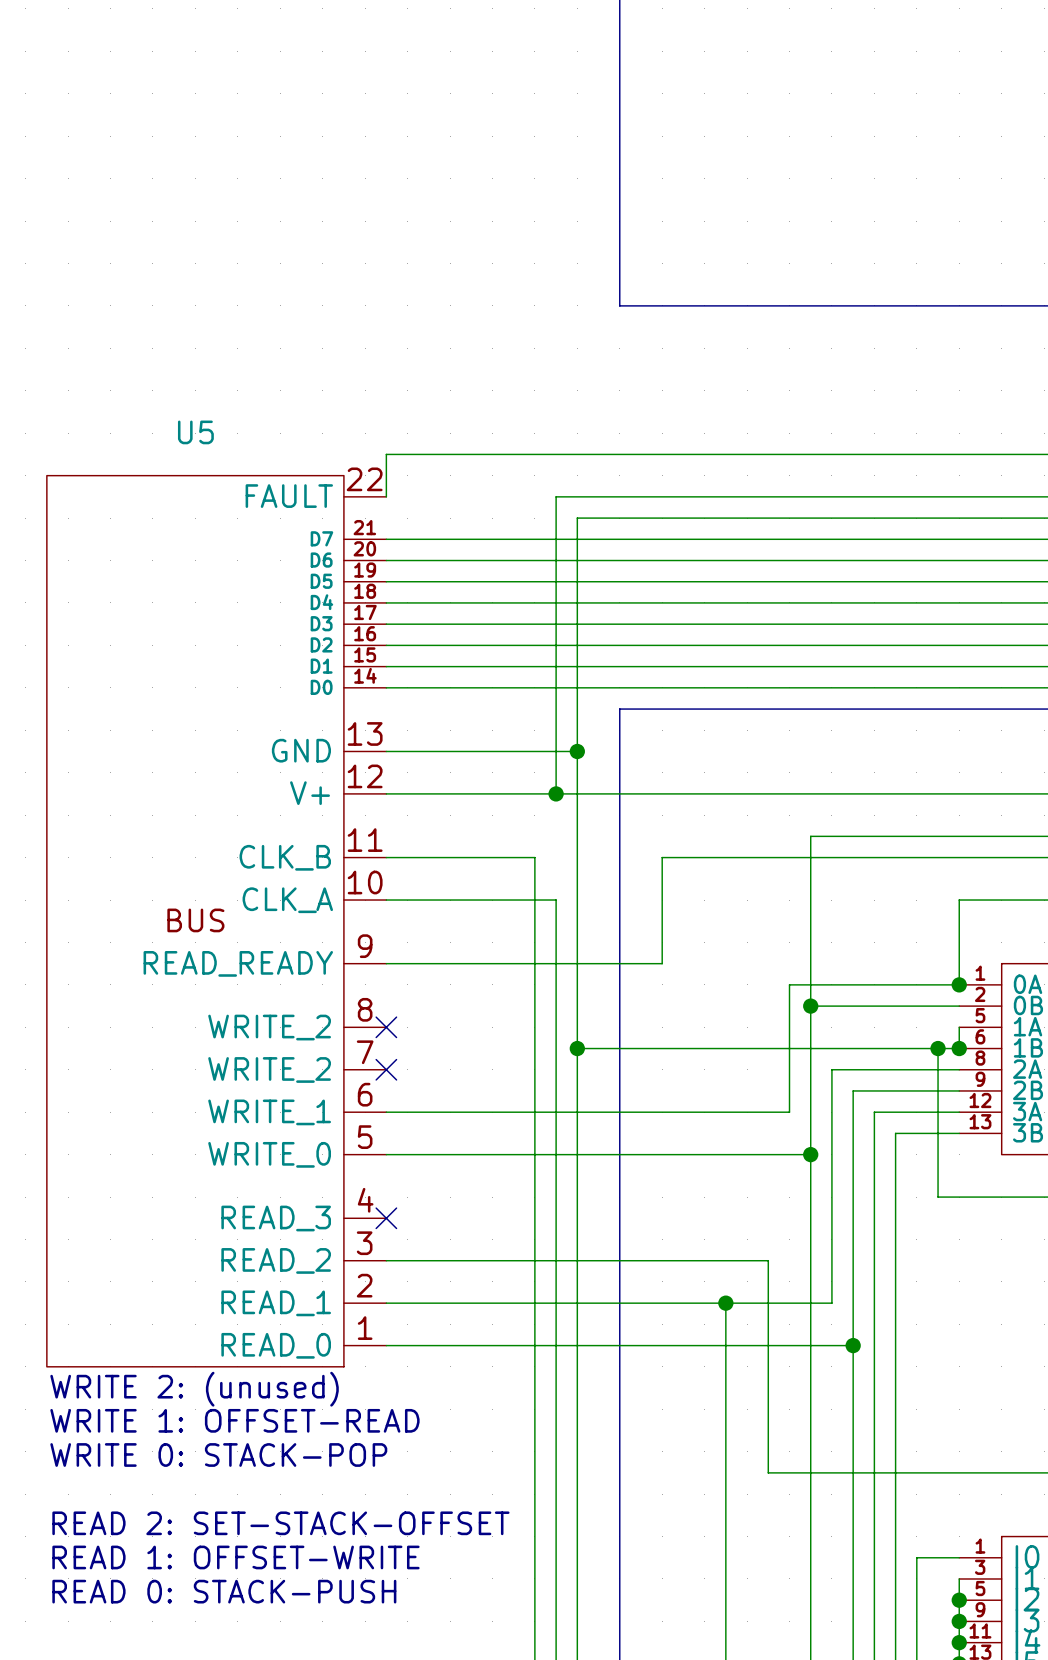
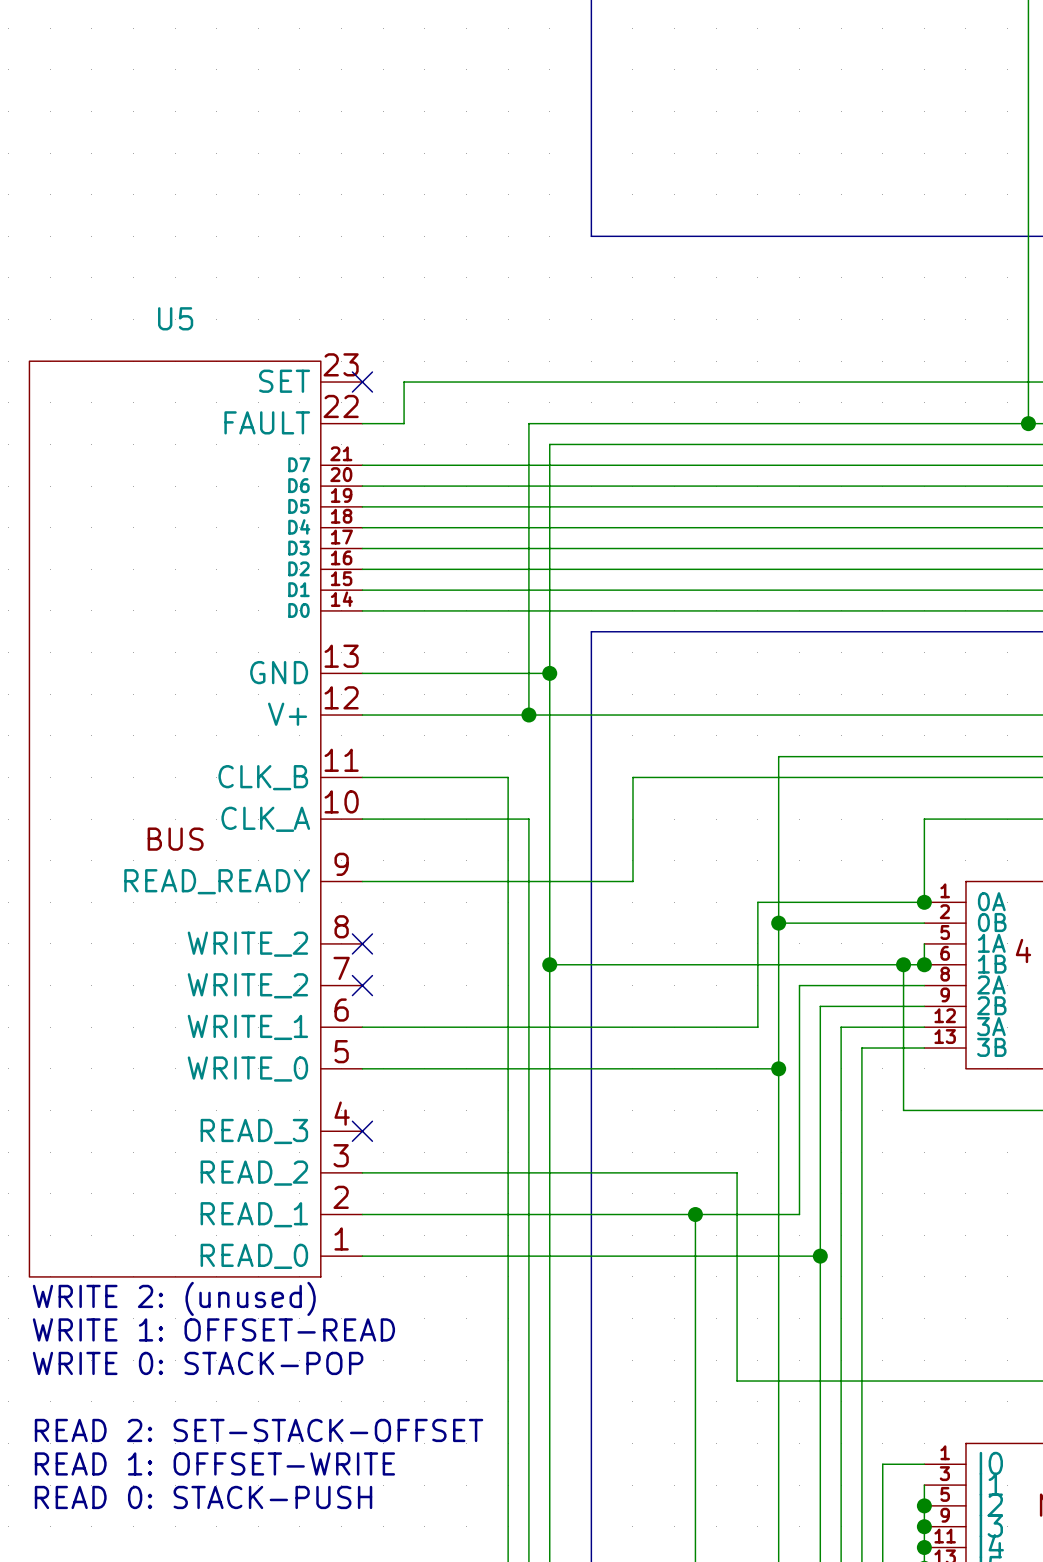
no-connect mark: none -> (362, 382)
wire: (428, 454) (386, 454) (386, 496) -> (404, 382) (404, 423) (362, 423)
U5 symbol: [46, 475, 387, 1367] -> [29, 361, 363, 1277]

